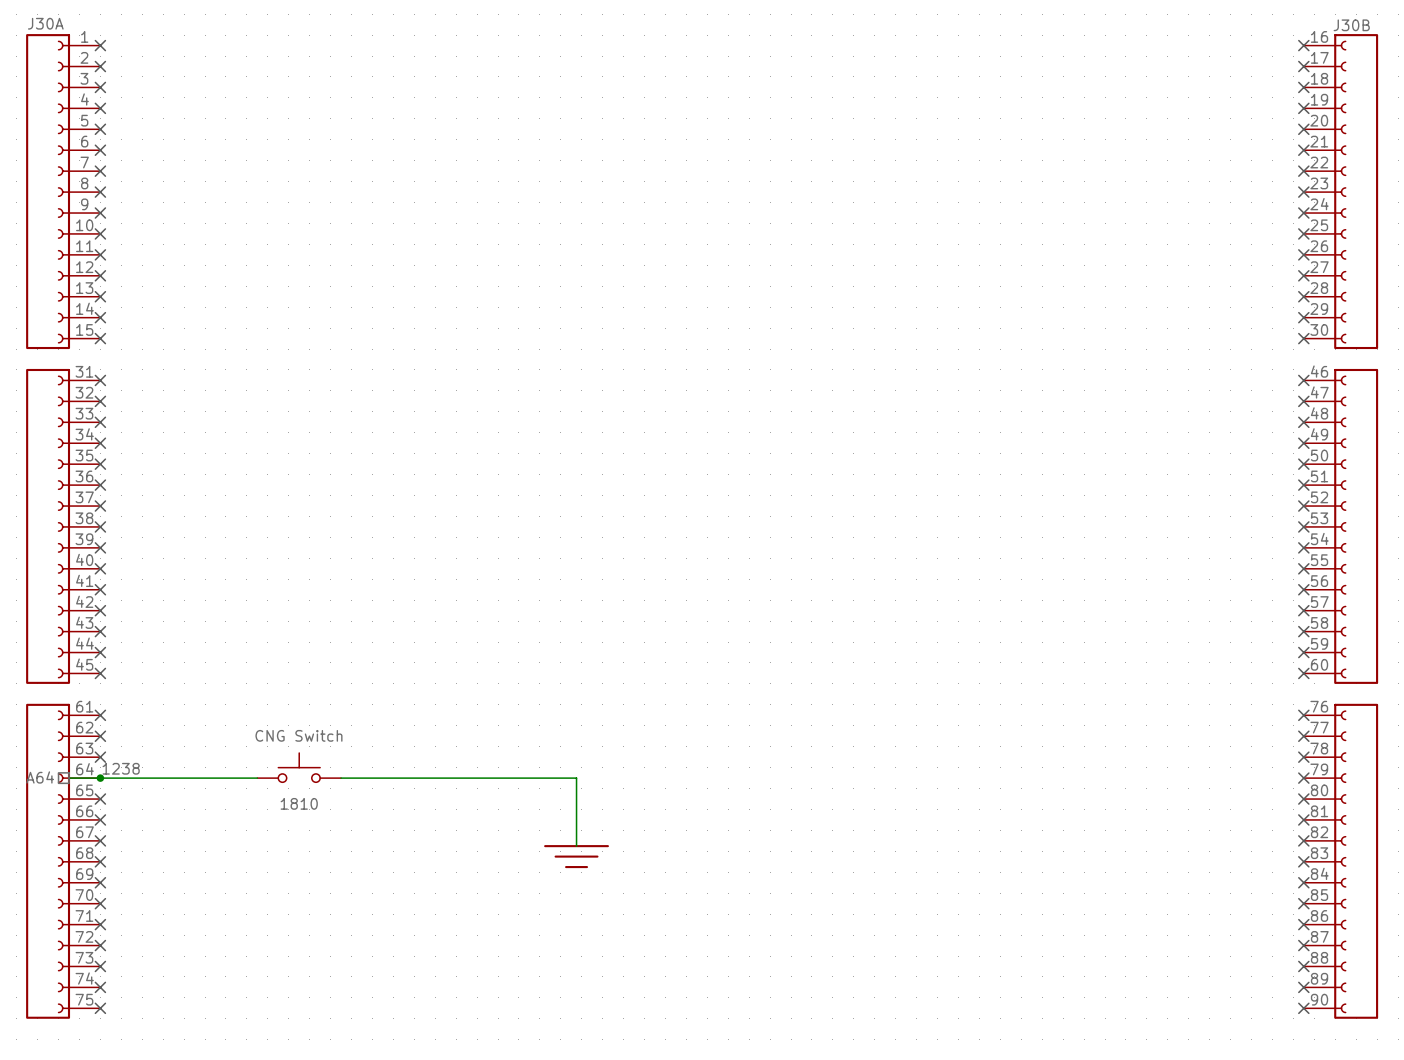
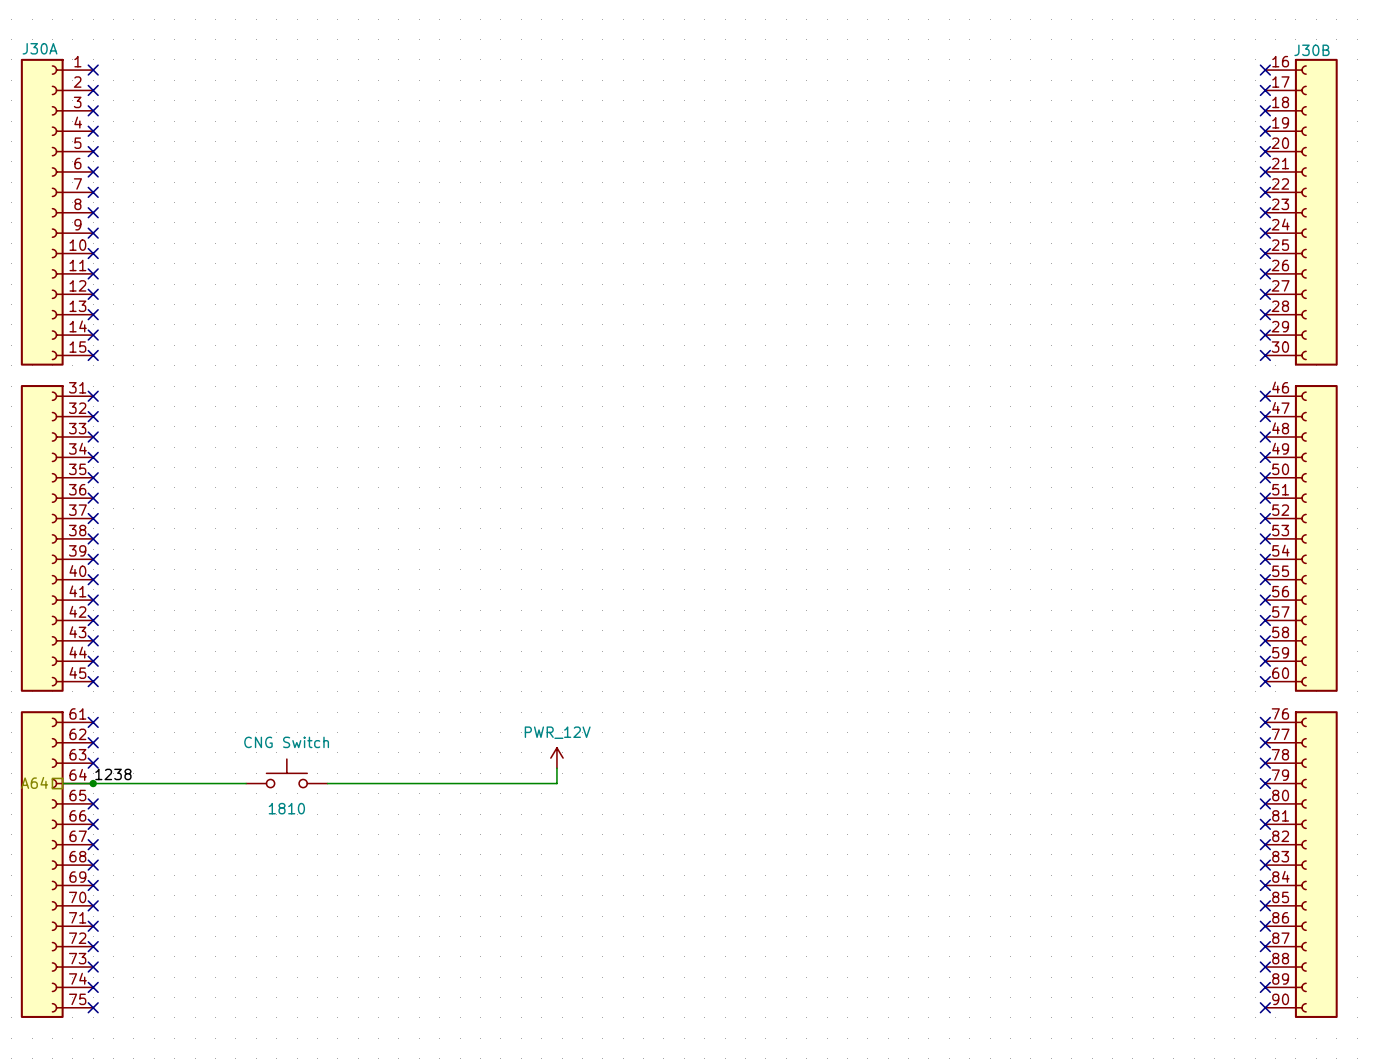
power symbol: none -> PWR_12V (556, 758)
wire: (576, 778) (576, 846) -> (556, 783) (556, 768)
power symbol: (576, 856) -> none

